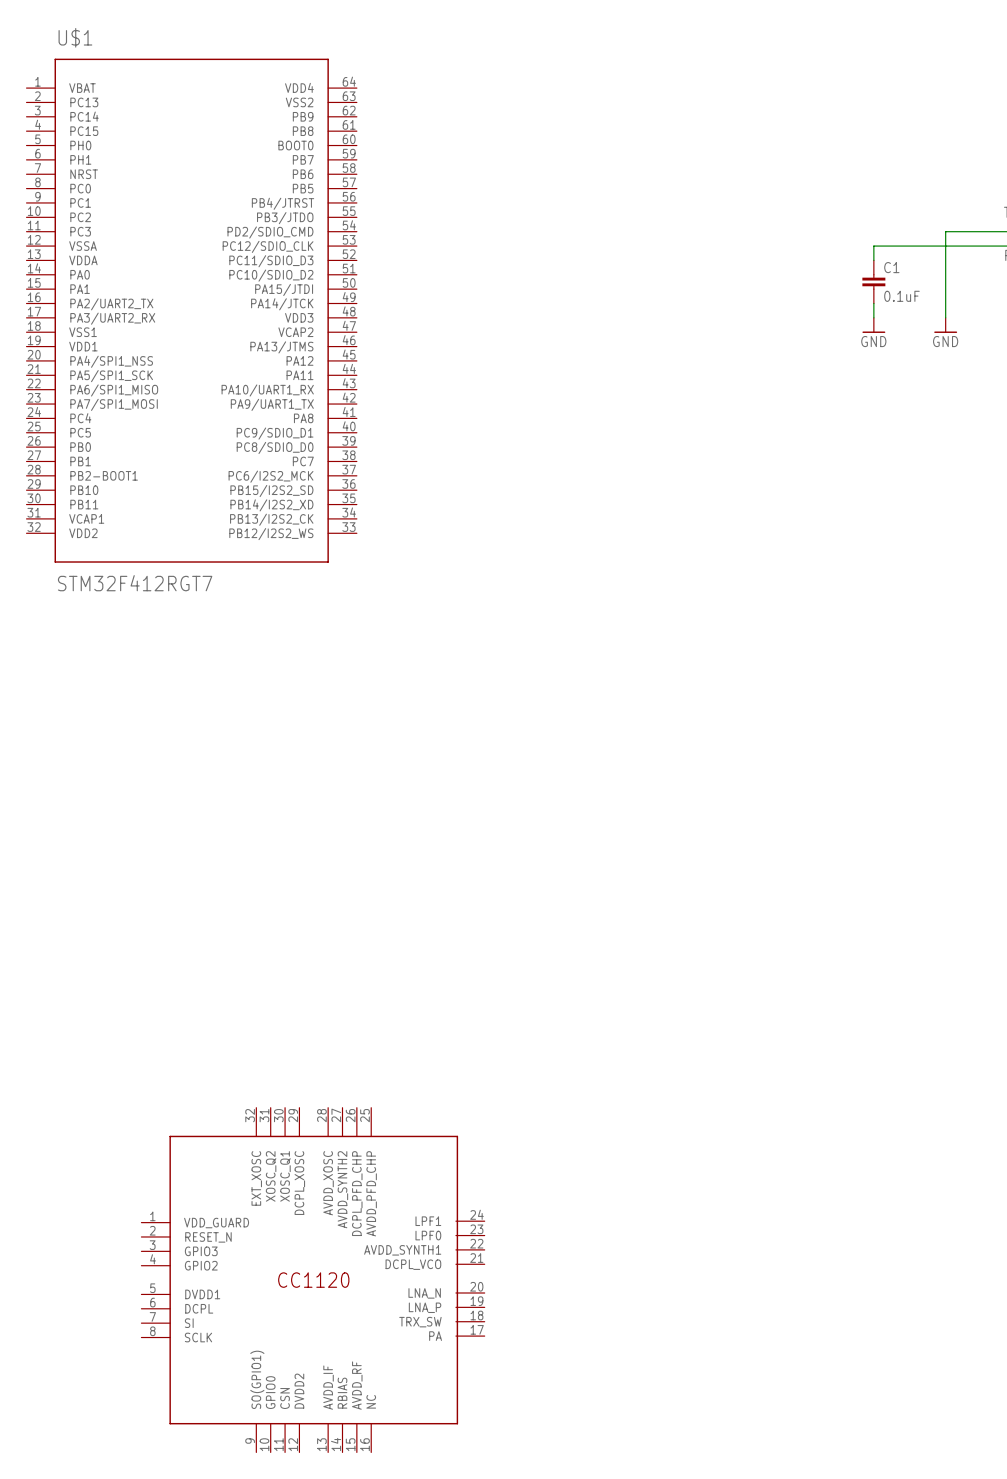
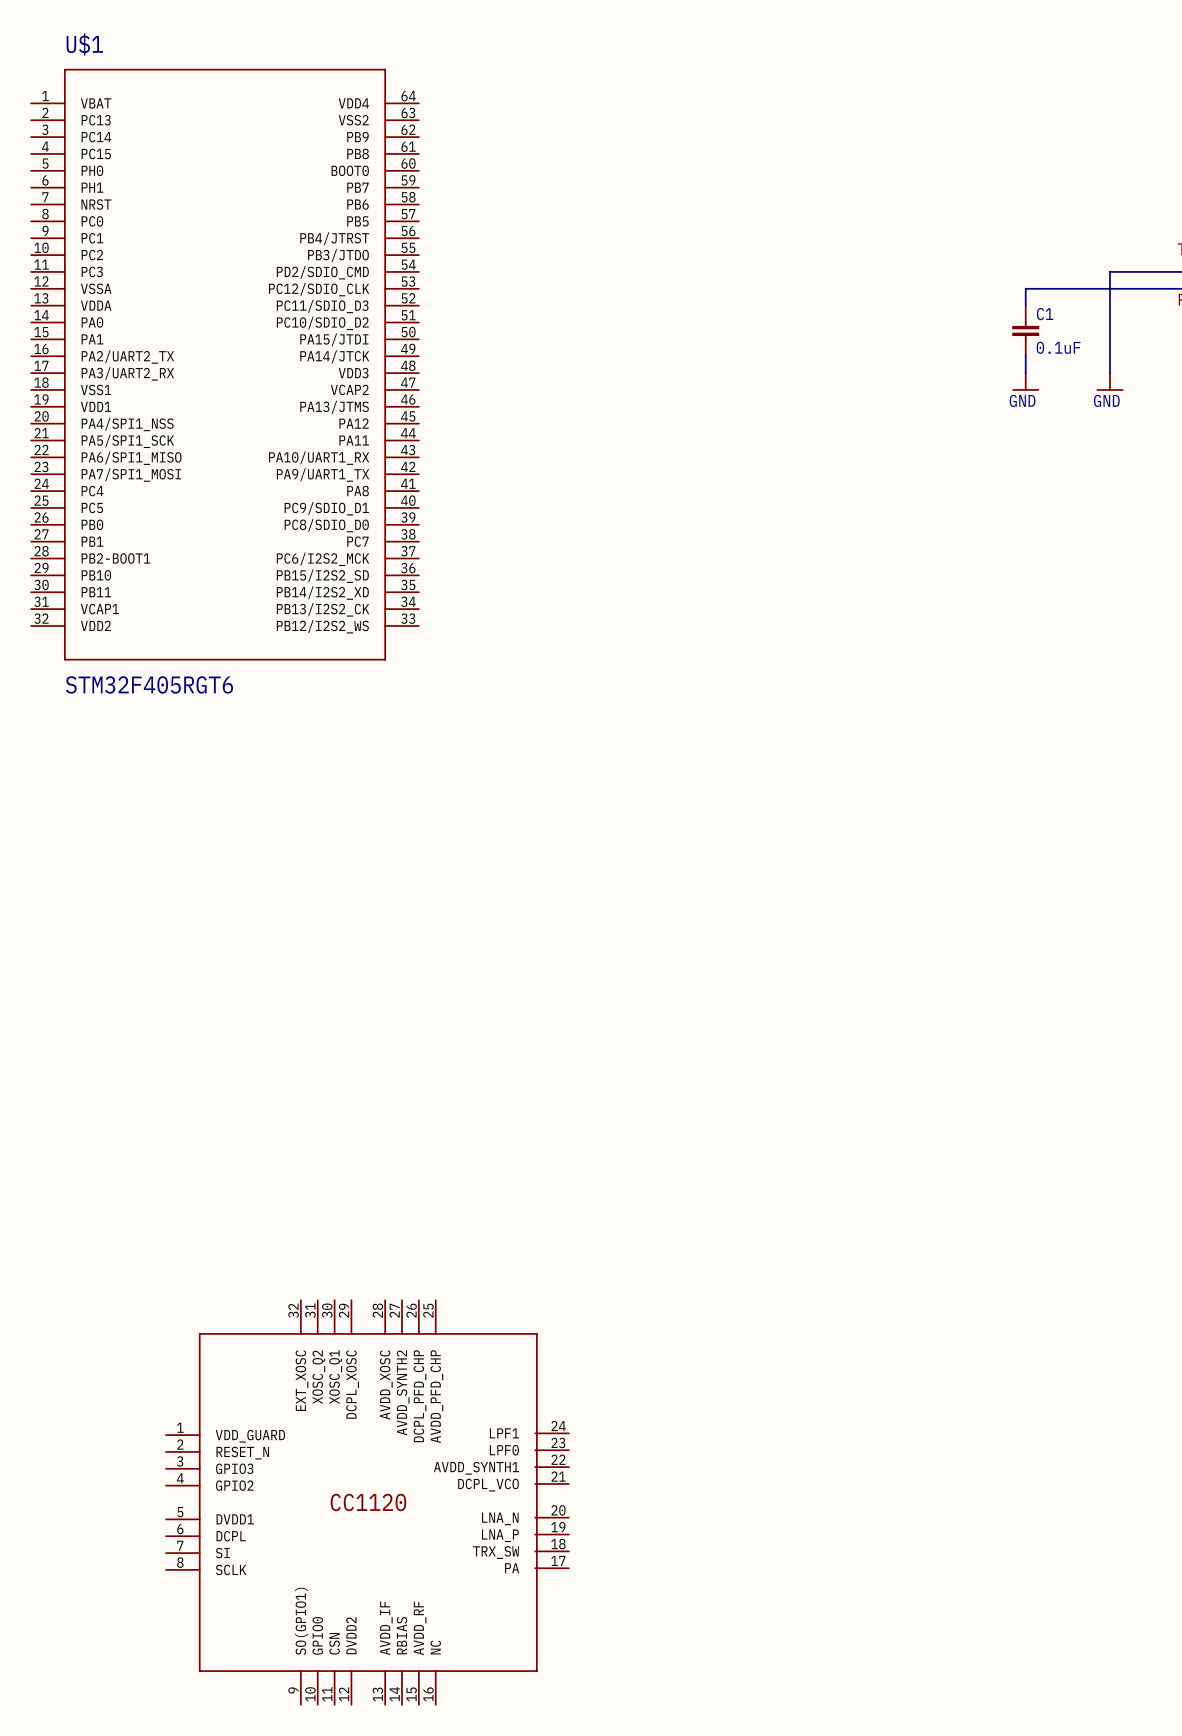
U$1 value: STM32F412RGT7 (135, 583) -> STM32F405RGT6 (149, 684)

